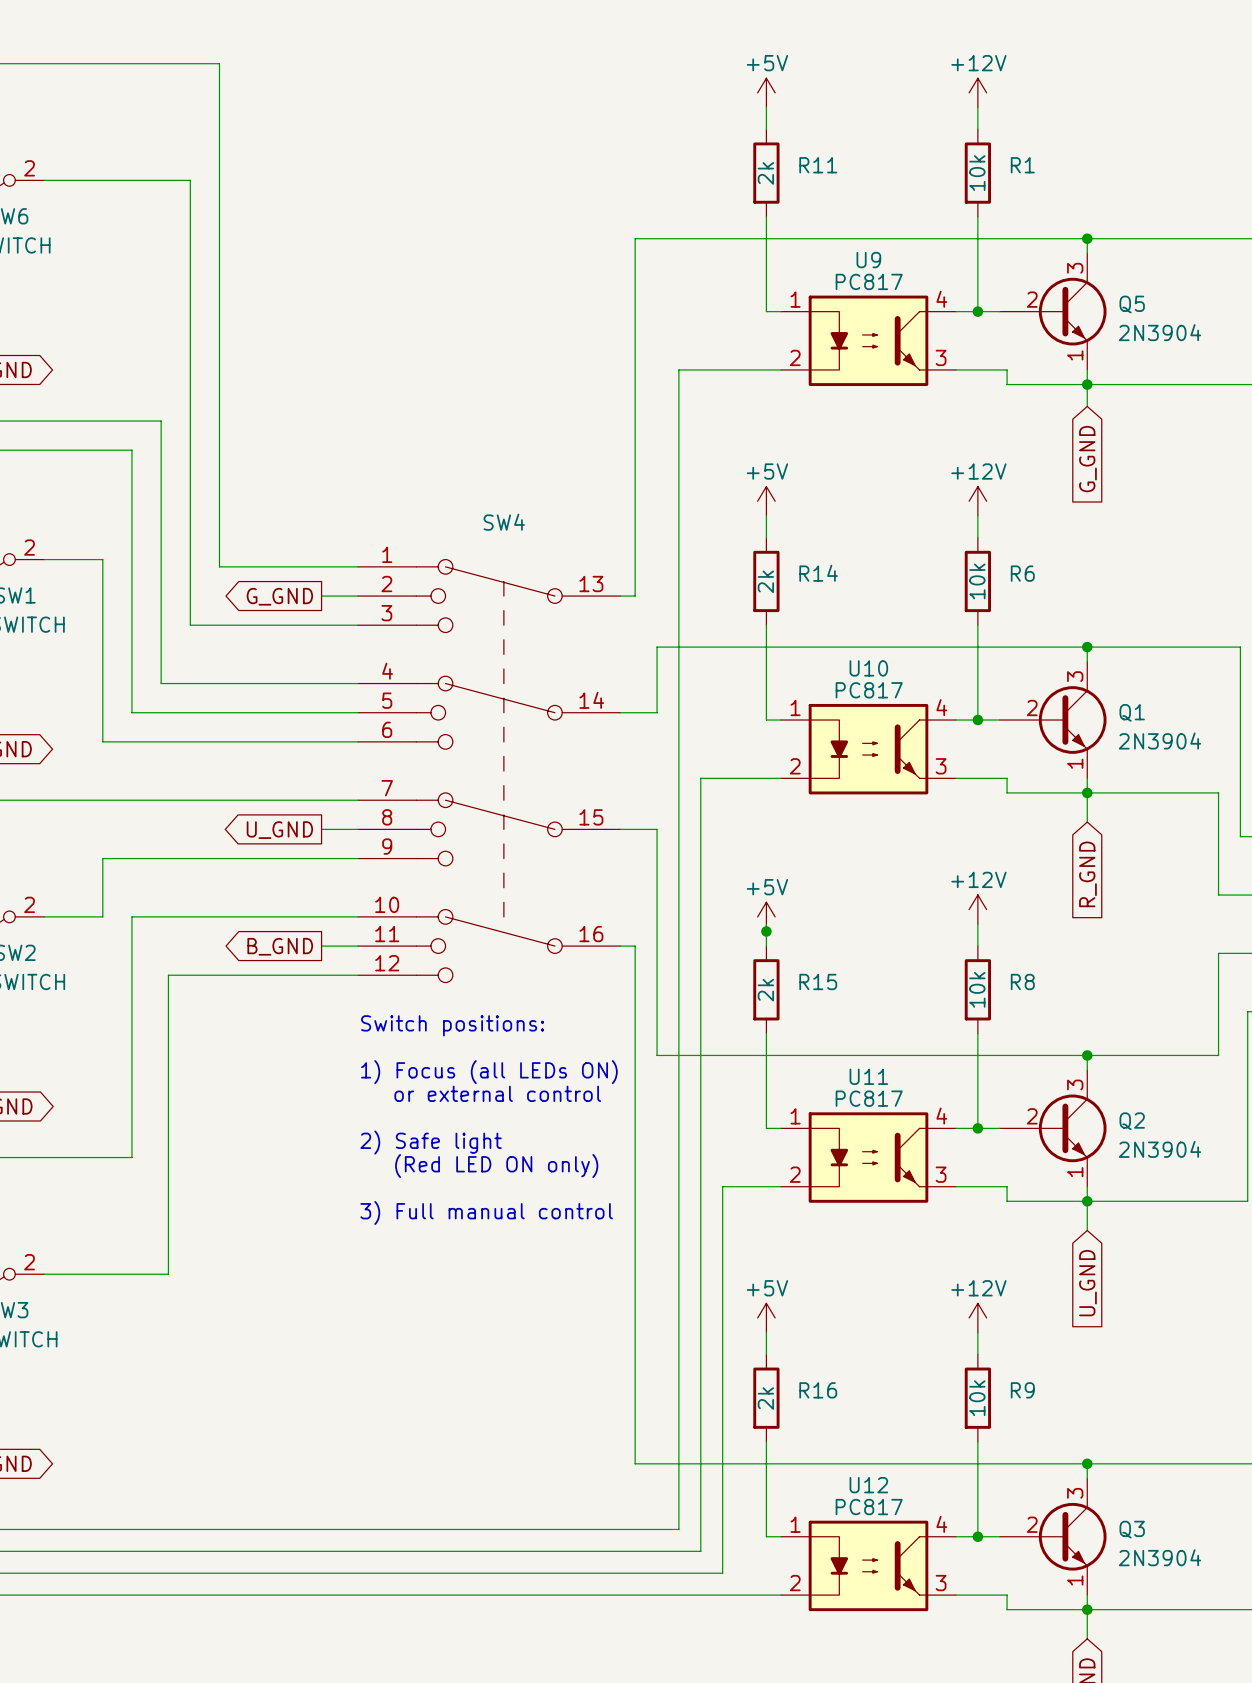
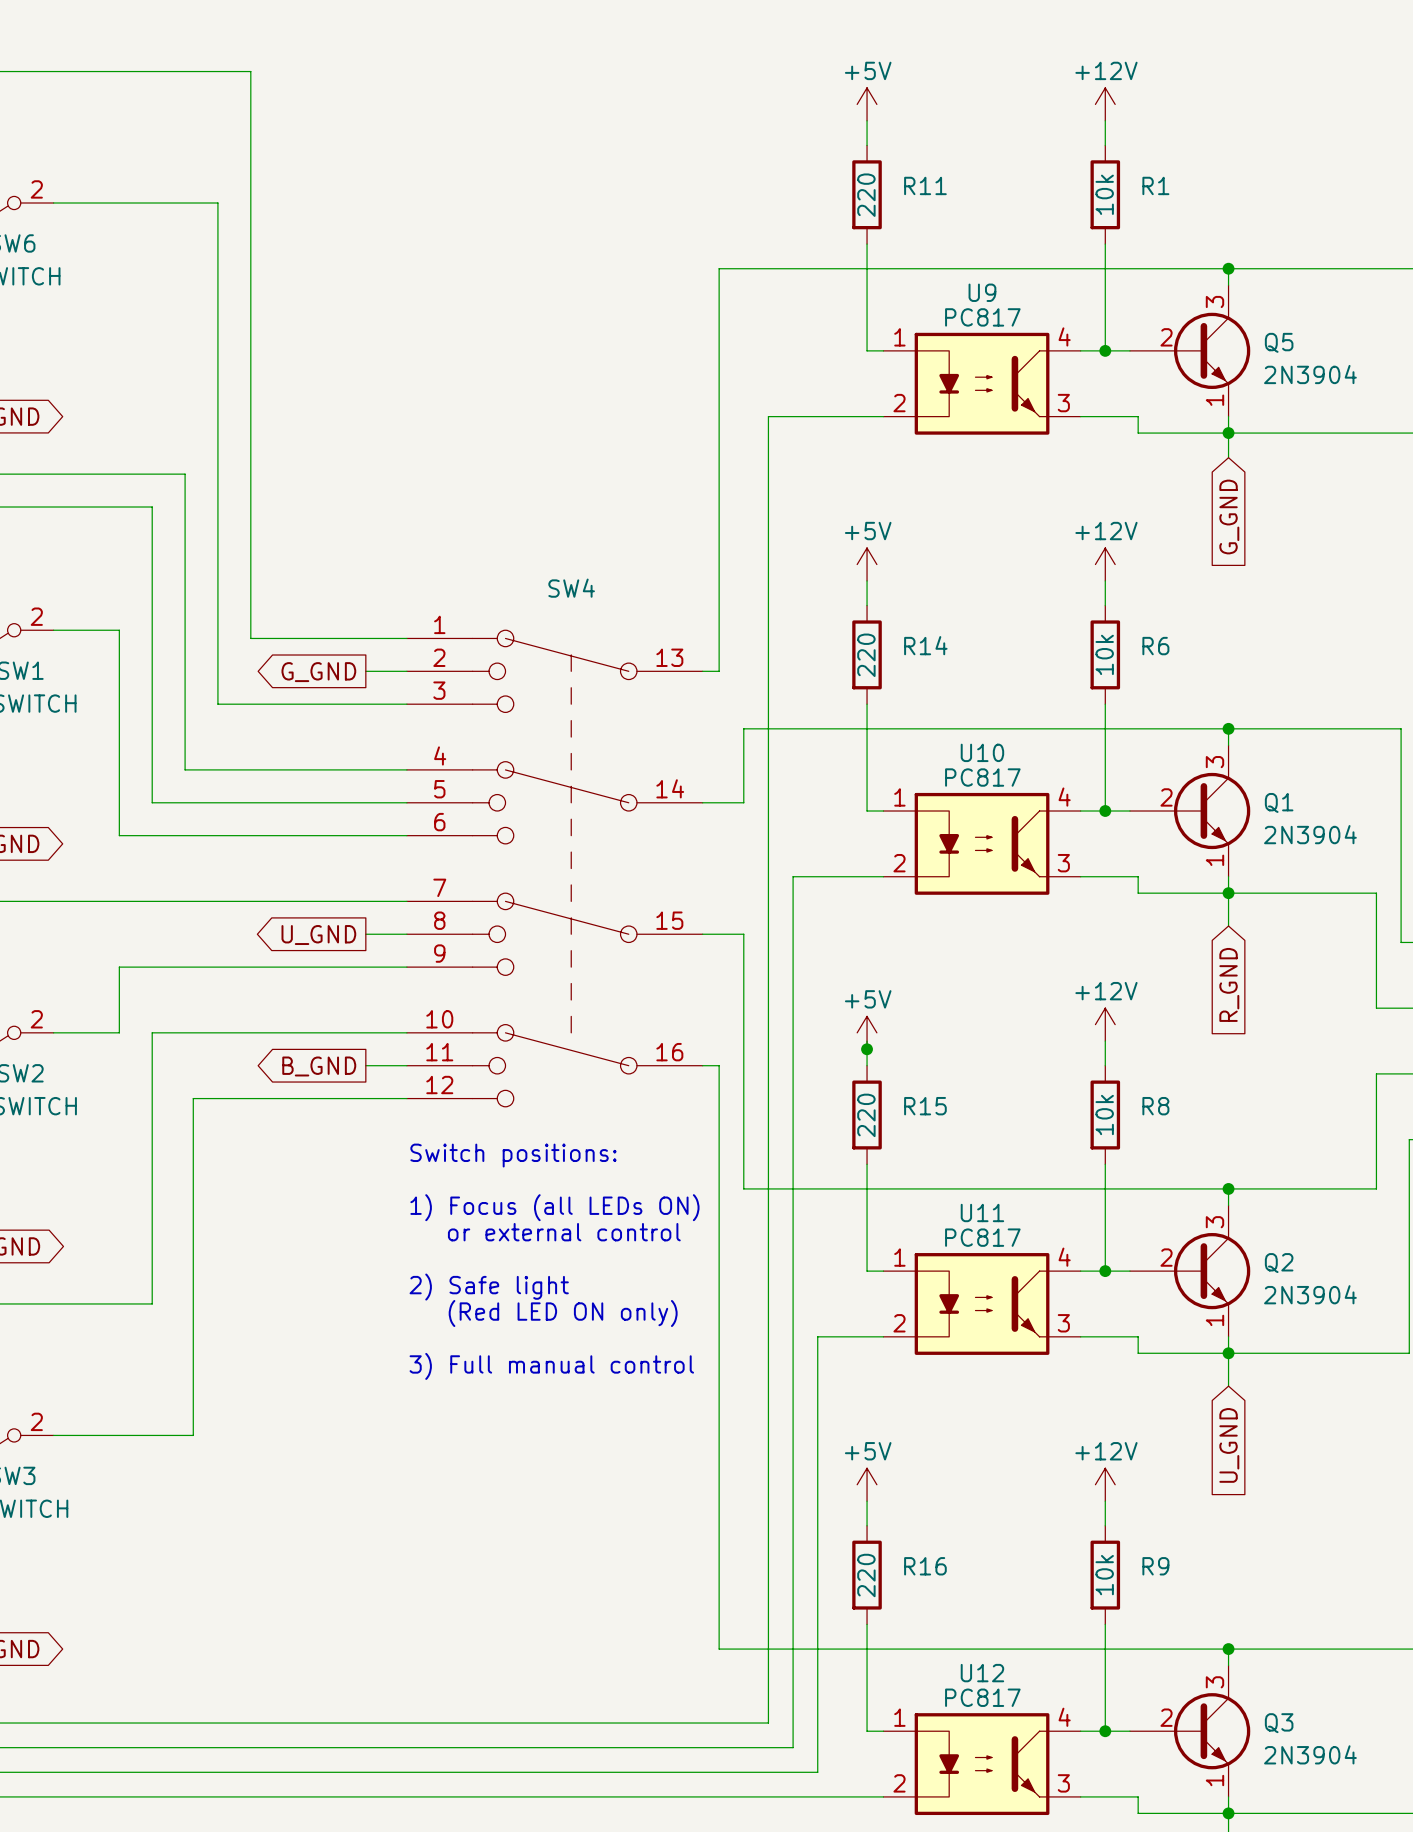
R11 value: 2k (765, 173) -> 220 (866, 195)
R14 value: 2k (765, 581) -> 220 (866, 655)
R15 value: 2k (765, 990) -> 220 (866, 1115)
R16 value: 2k (765, 1398) -> 220 (866, 1575)

